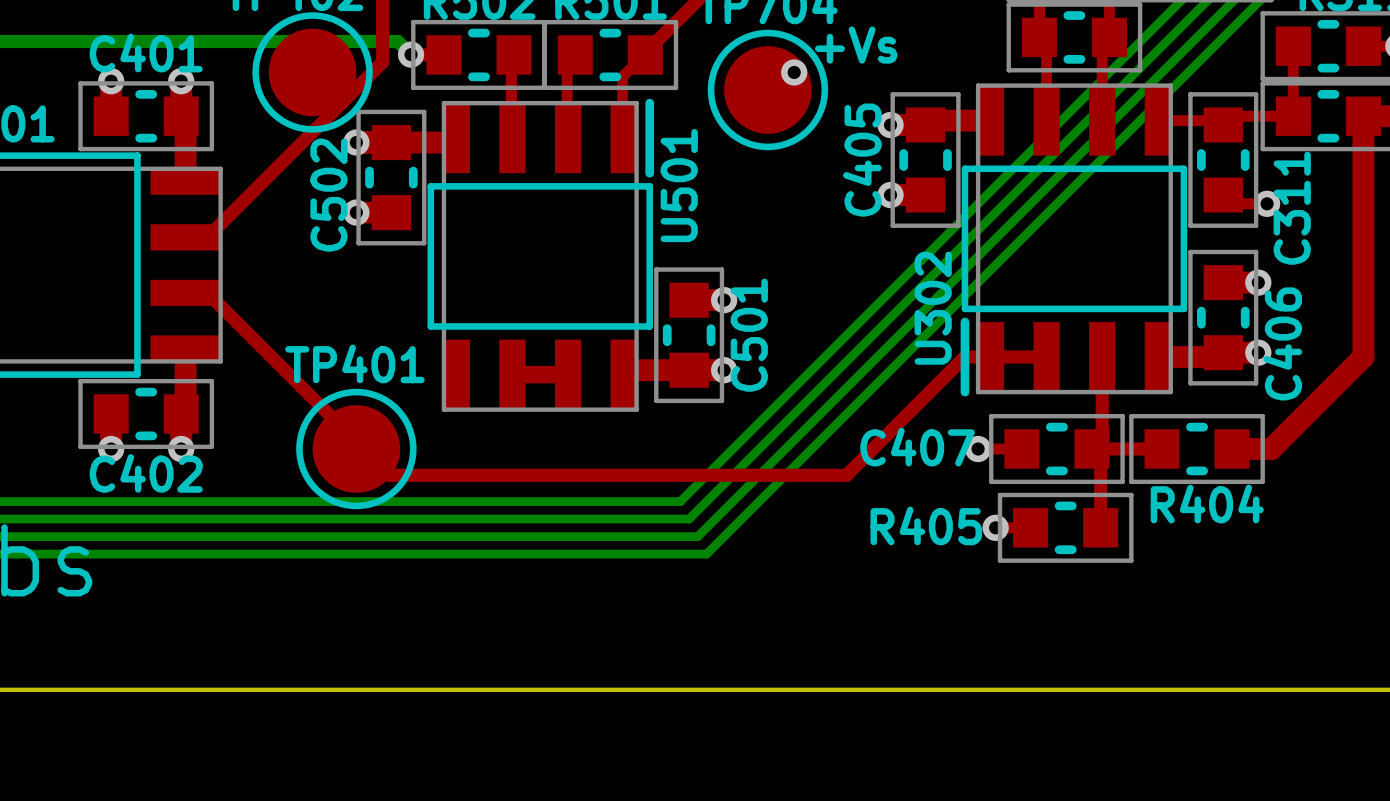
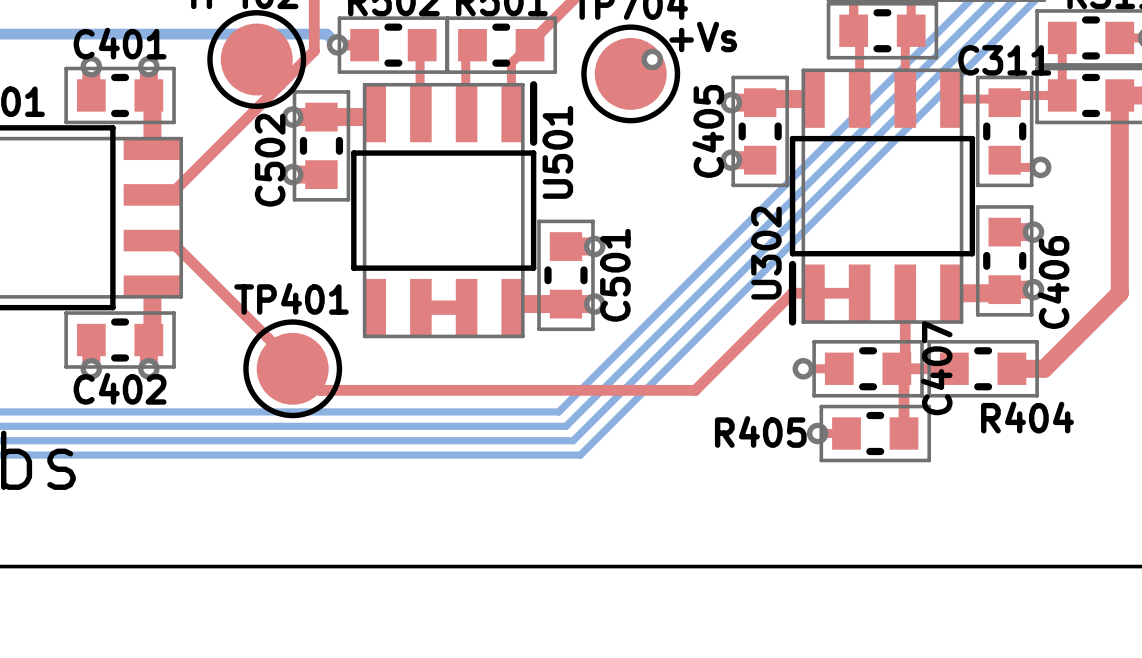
C311 name rotation: 0° (1292, 208) -> 90° clockwise (1004, 60)
C311 name position: C311 (1292, 208) -> C311 (1004, 60)
C407 name rotation: 0° (917, 447) -> 90° counterclockwise (936, 368)
C407 name position: C407 (917, 447) -> C407 (936, 368)
R404 name position: R404 (1207, 504) -> R404 (1027, 417)

